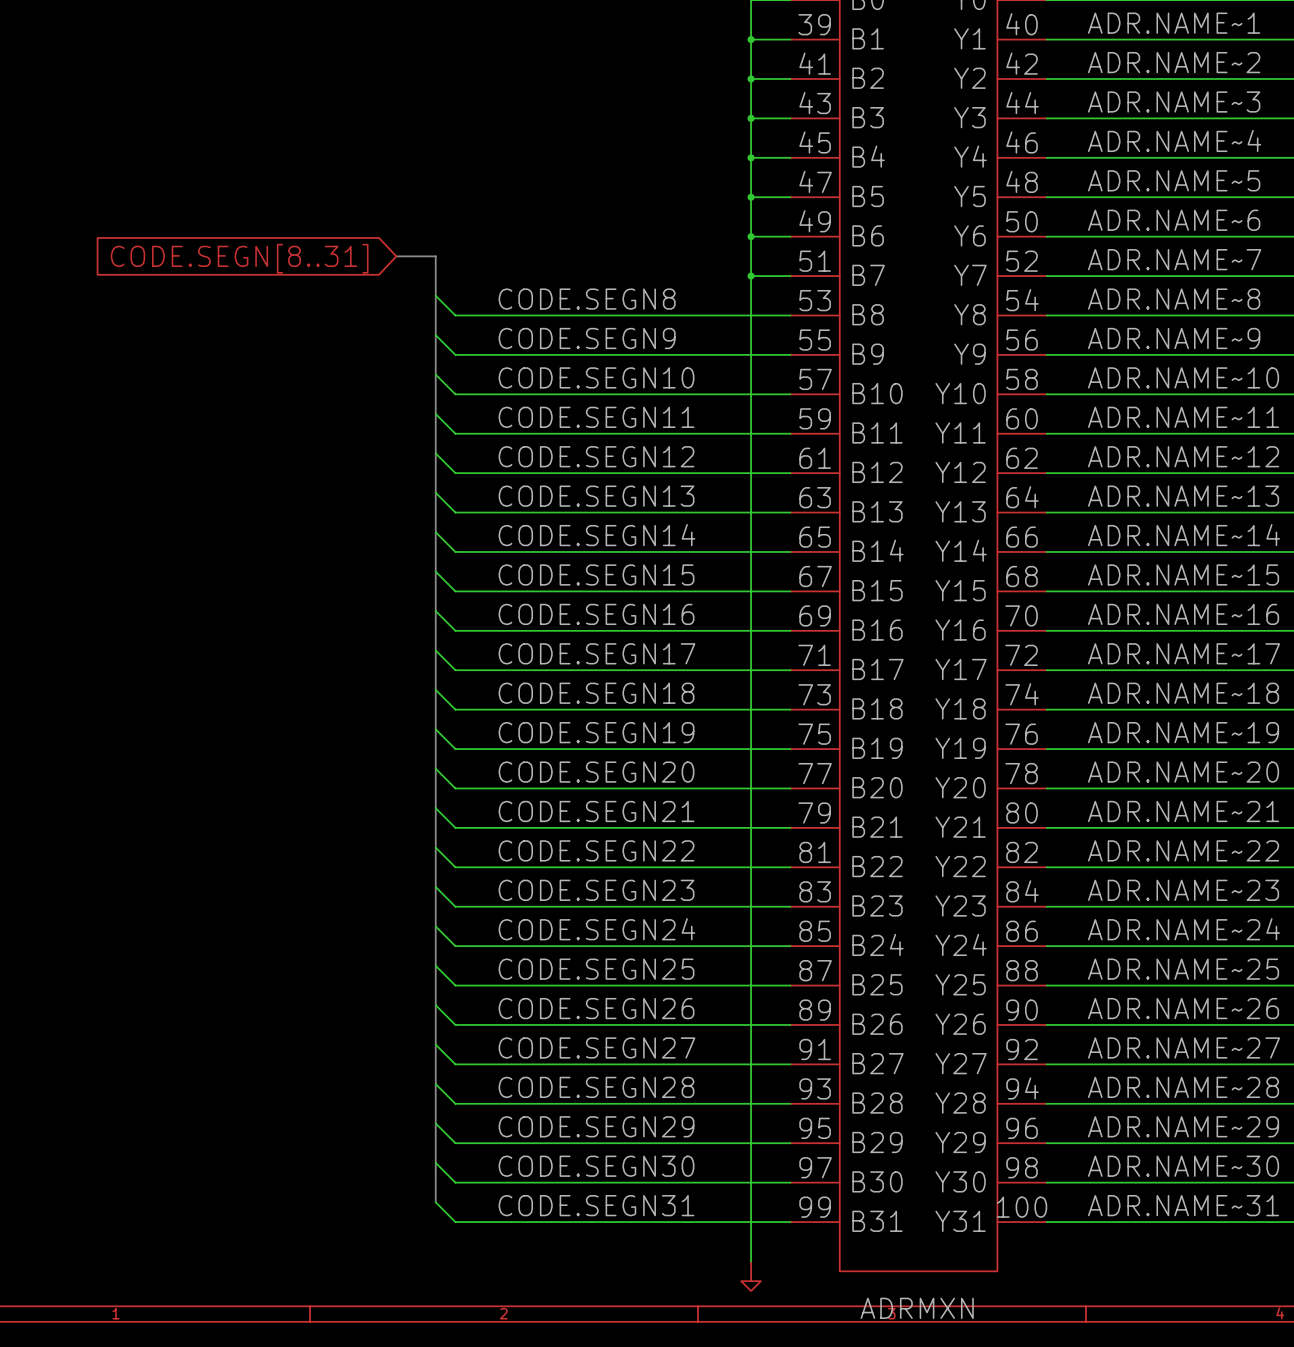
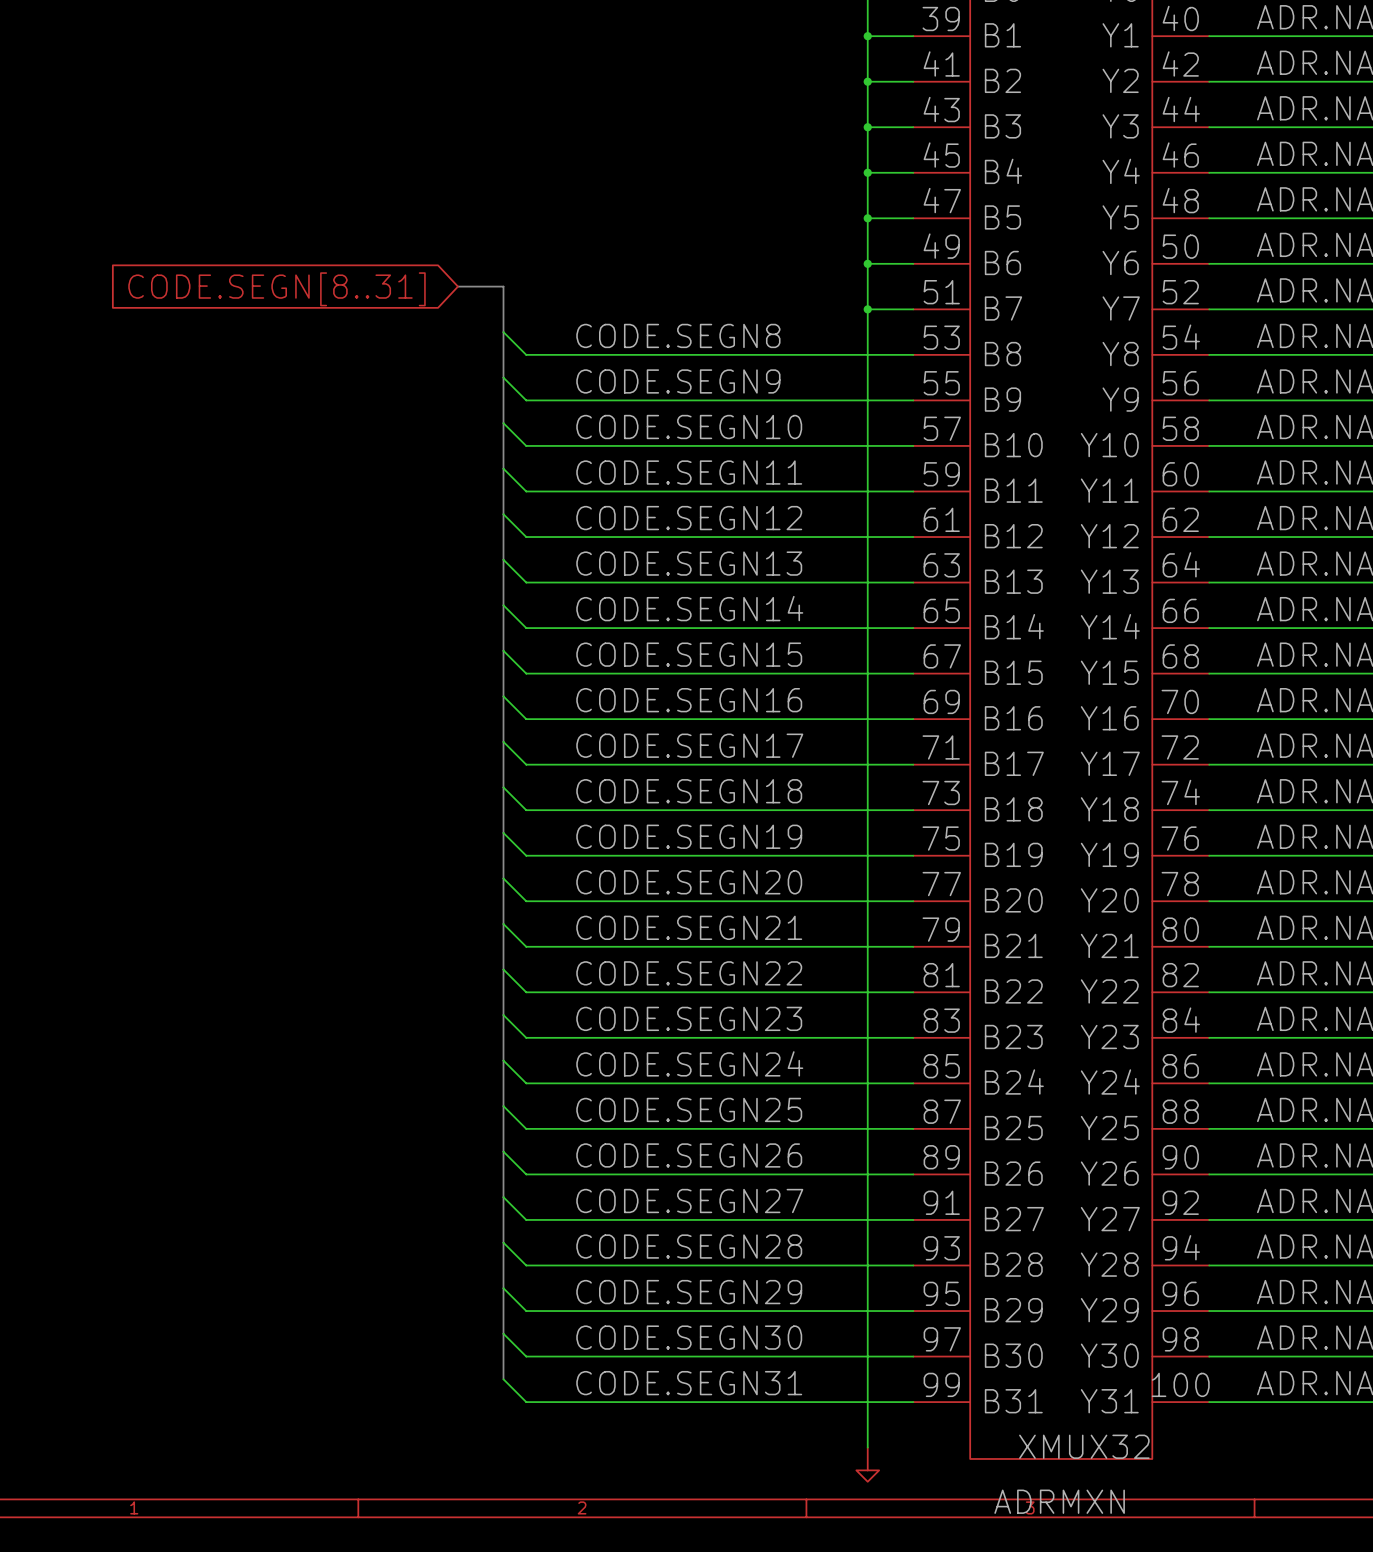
part value: none -> XMUX32 (1084, 1446)

